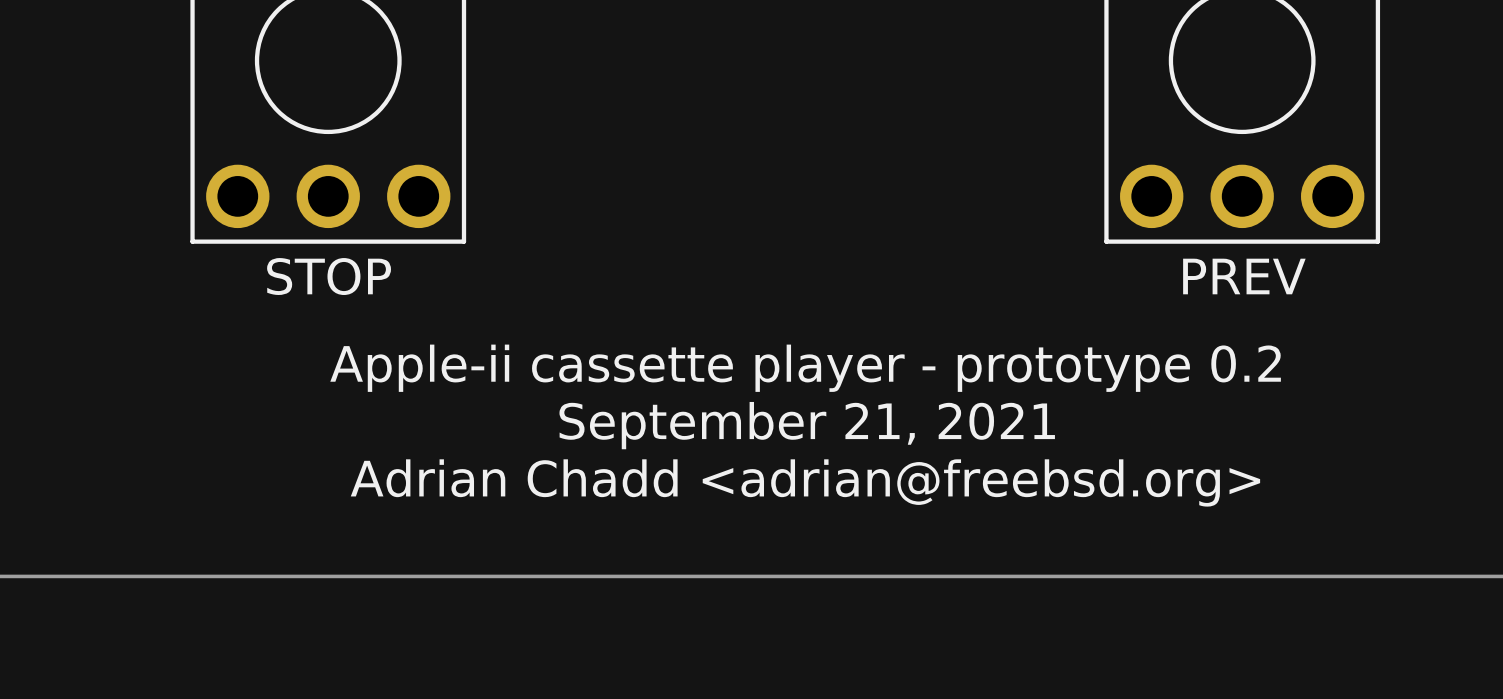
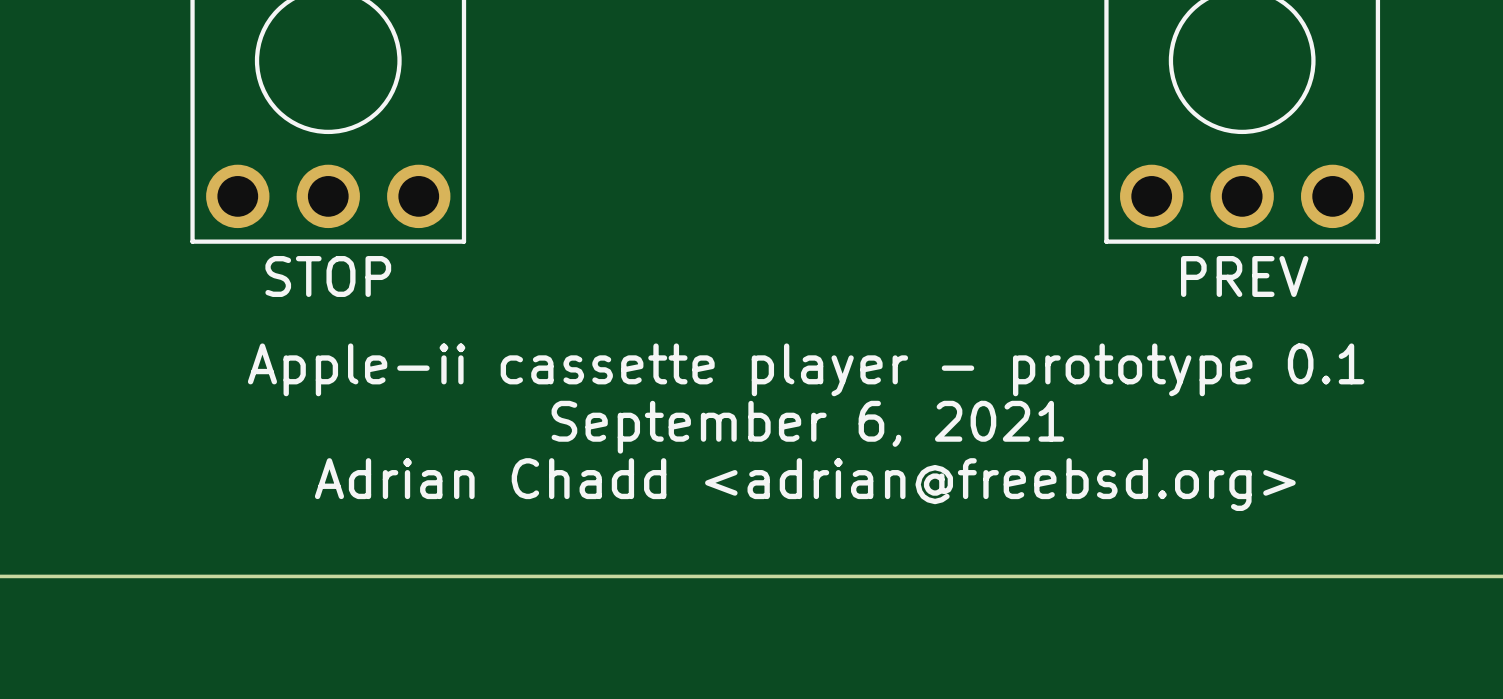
text: Apple-ii cassette player - prototype 0.2 (805, 368) -> Apple-ii cassette player - prototype 0.1 (806, 369)
text: September 21, 2021 (807, 425) -> September 6, 2021 (807, 427)

